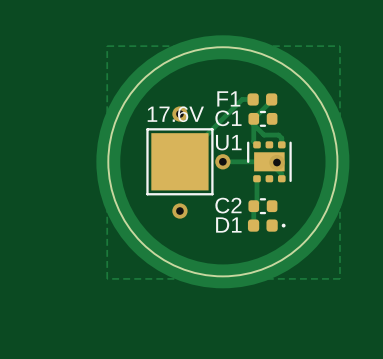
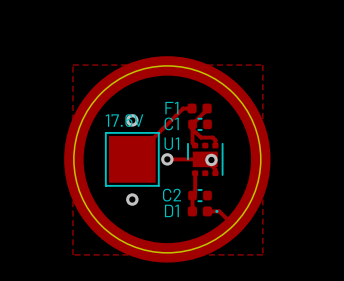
track: none -> (207, 211) (219, 211) (231, 223)

